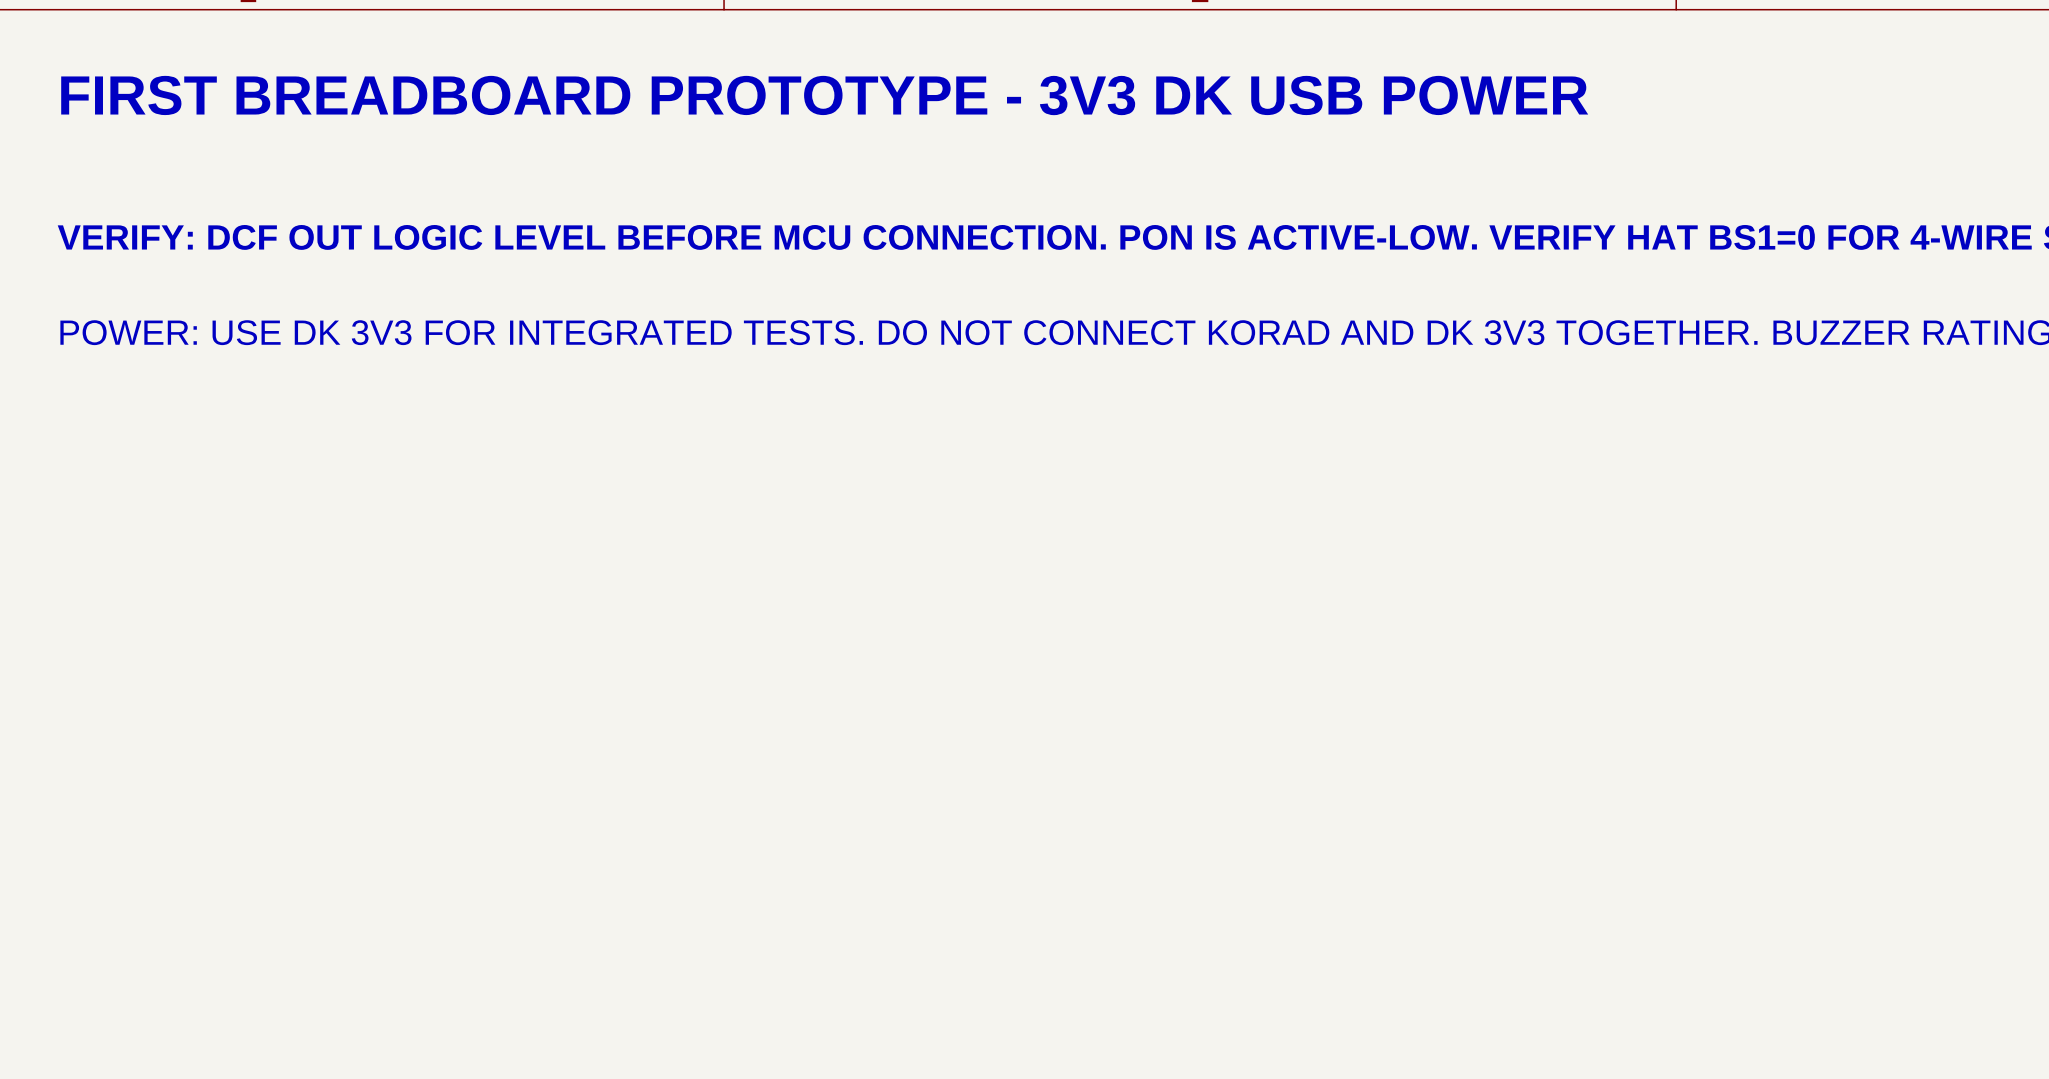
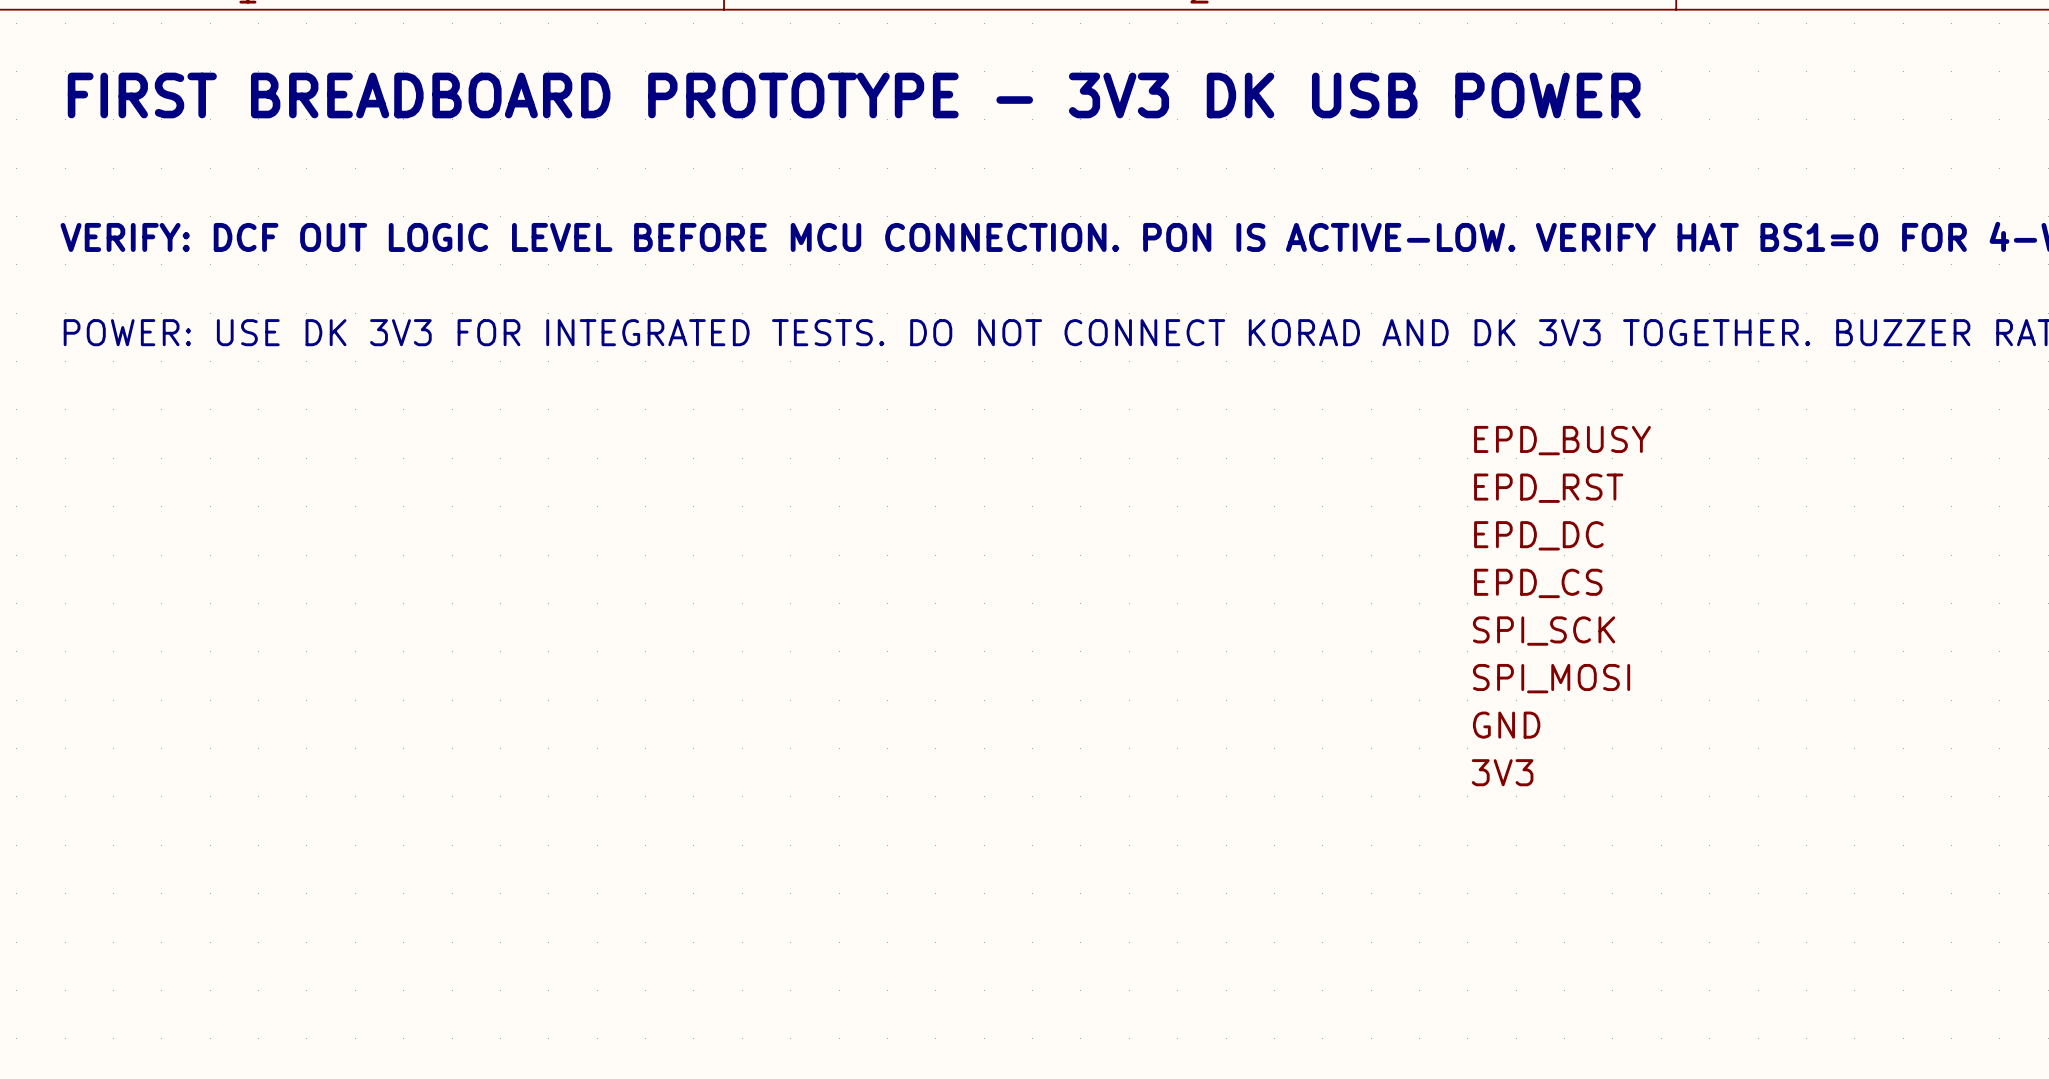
label: none -> EPD_BUSY (1562, 440)
label: none -> EPD_RST (1548, 488)
label: none -> EPD_DC (1538, 535)
label: none -> EPD_CS (1538, 583)
label: none -> SPI_SCK (1544, 631)
label: none -> SPI_MOSI (1551, 678)
label: none -> GND (1506, 725)
label: none -> 3V3 (1502, 772)

